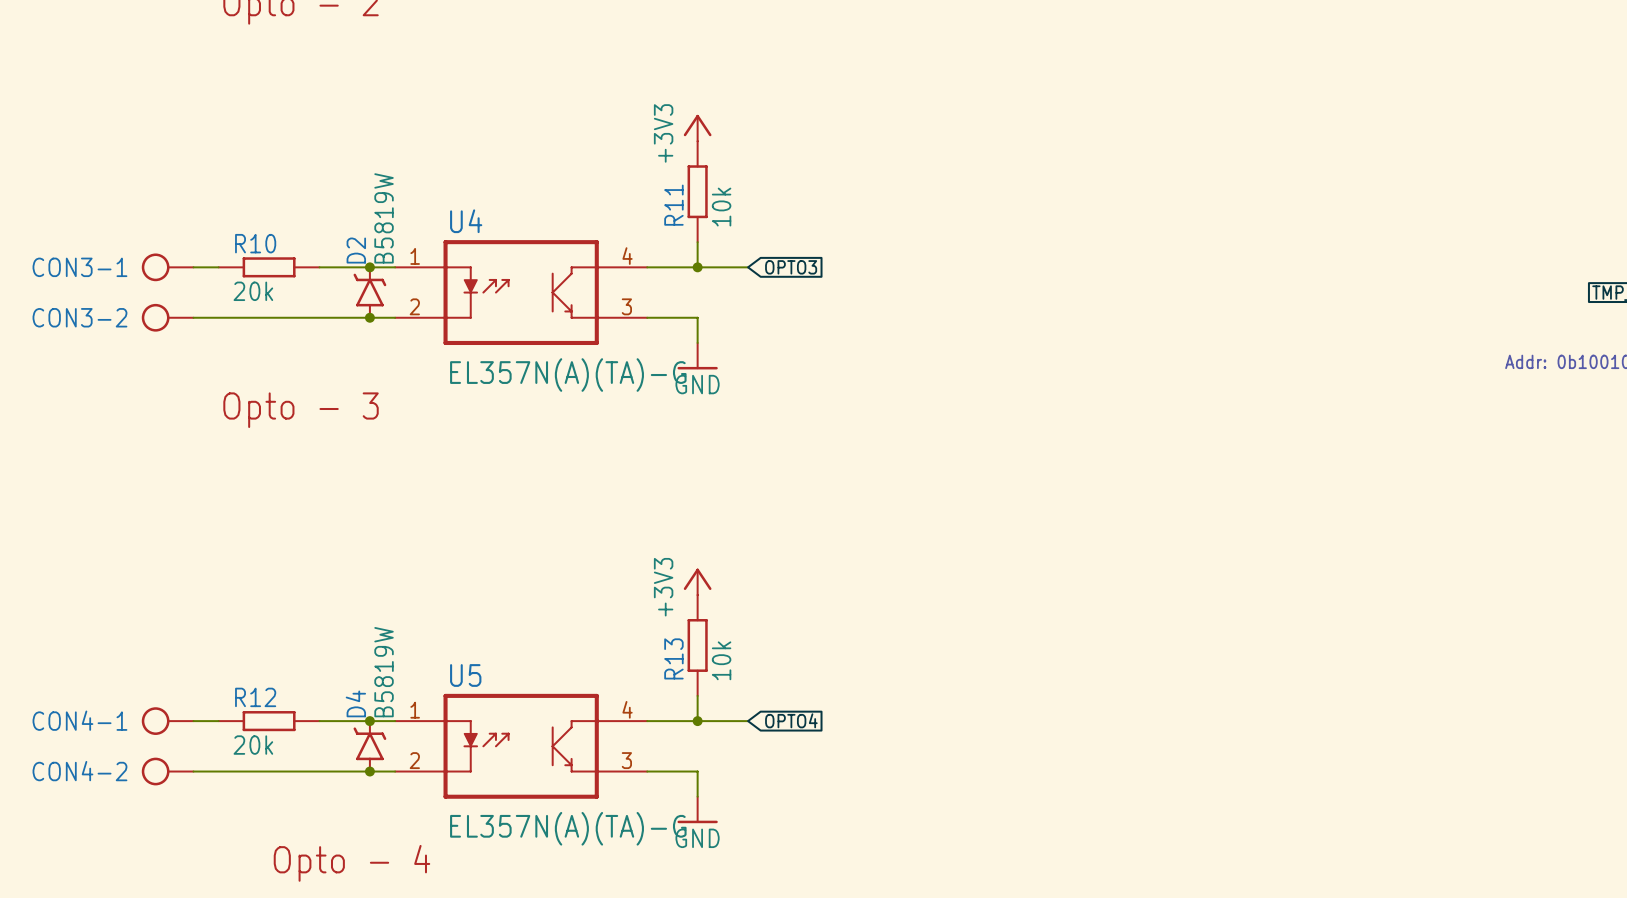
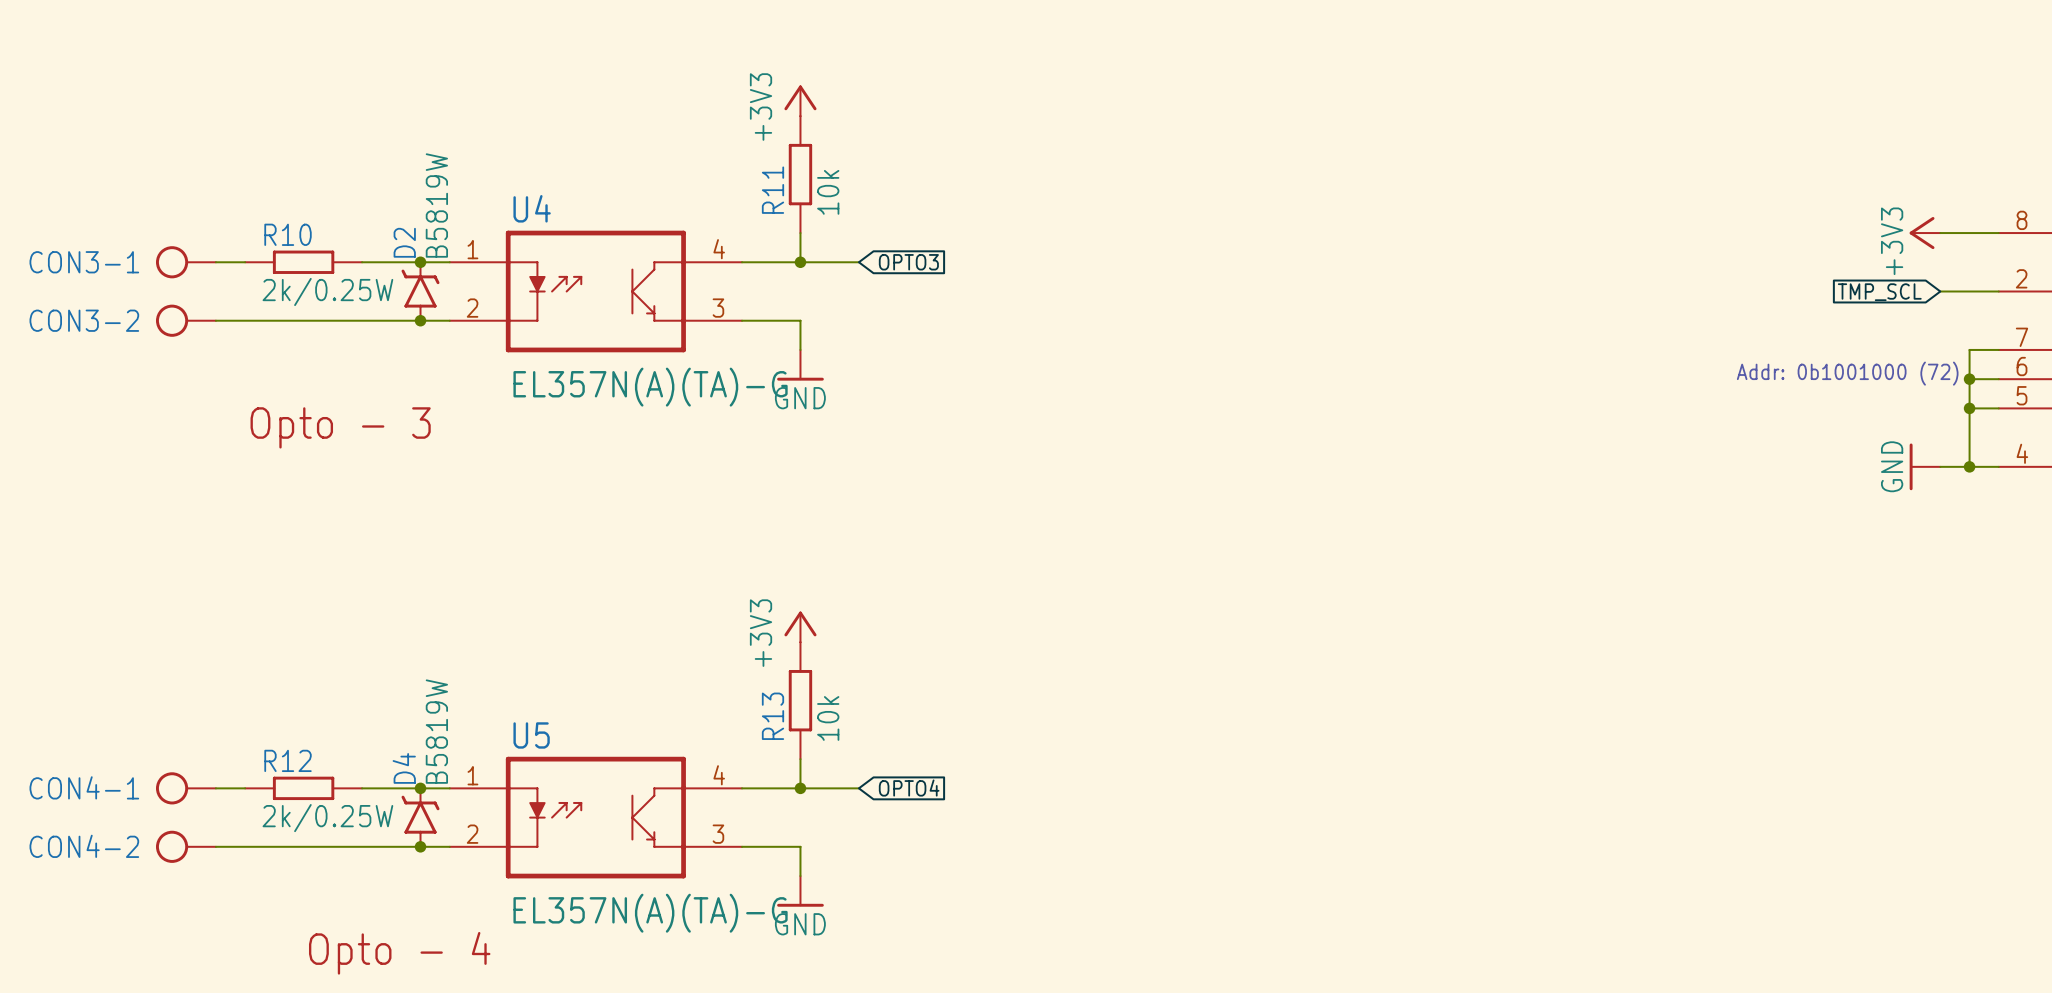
R10 value: 20k (253, 291) -> 2k/0.25W (327, 291)
R12 value: 20k (253, 745) -> 2k/0.25W (327, 818)

